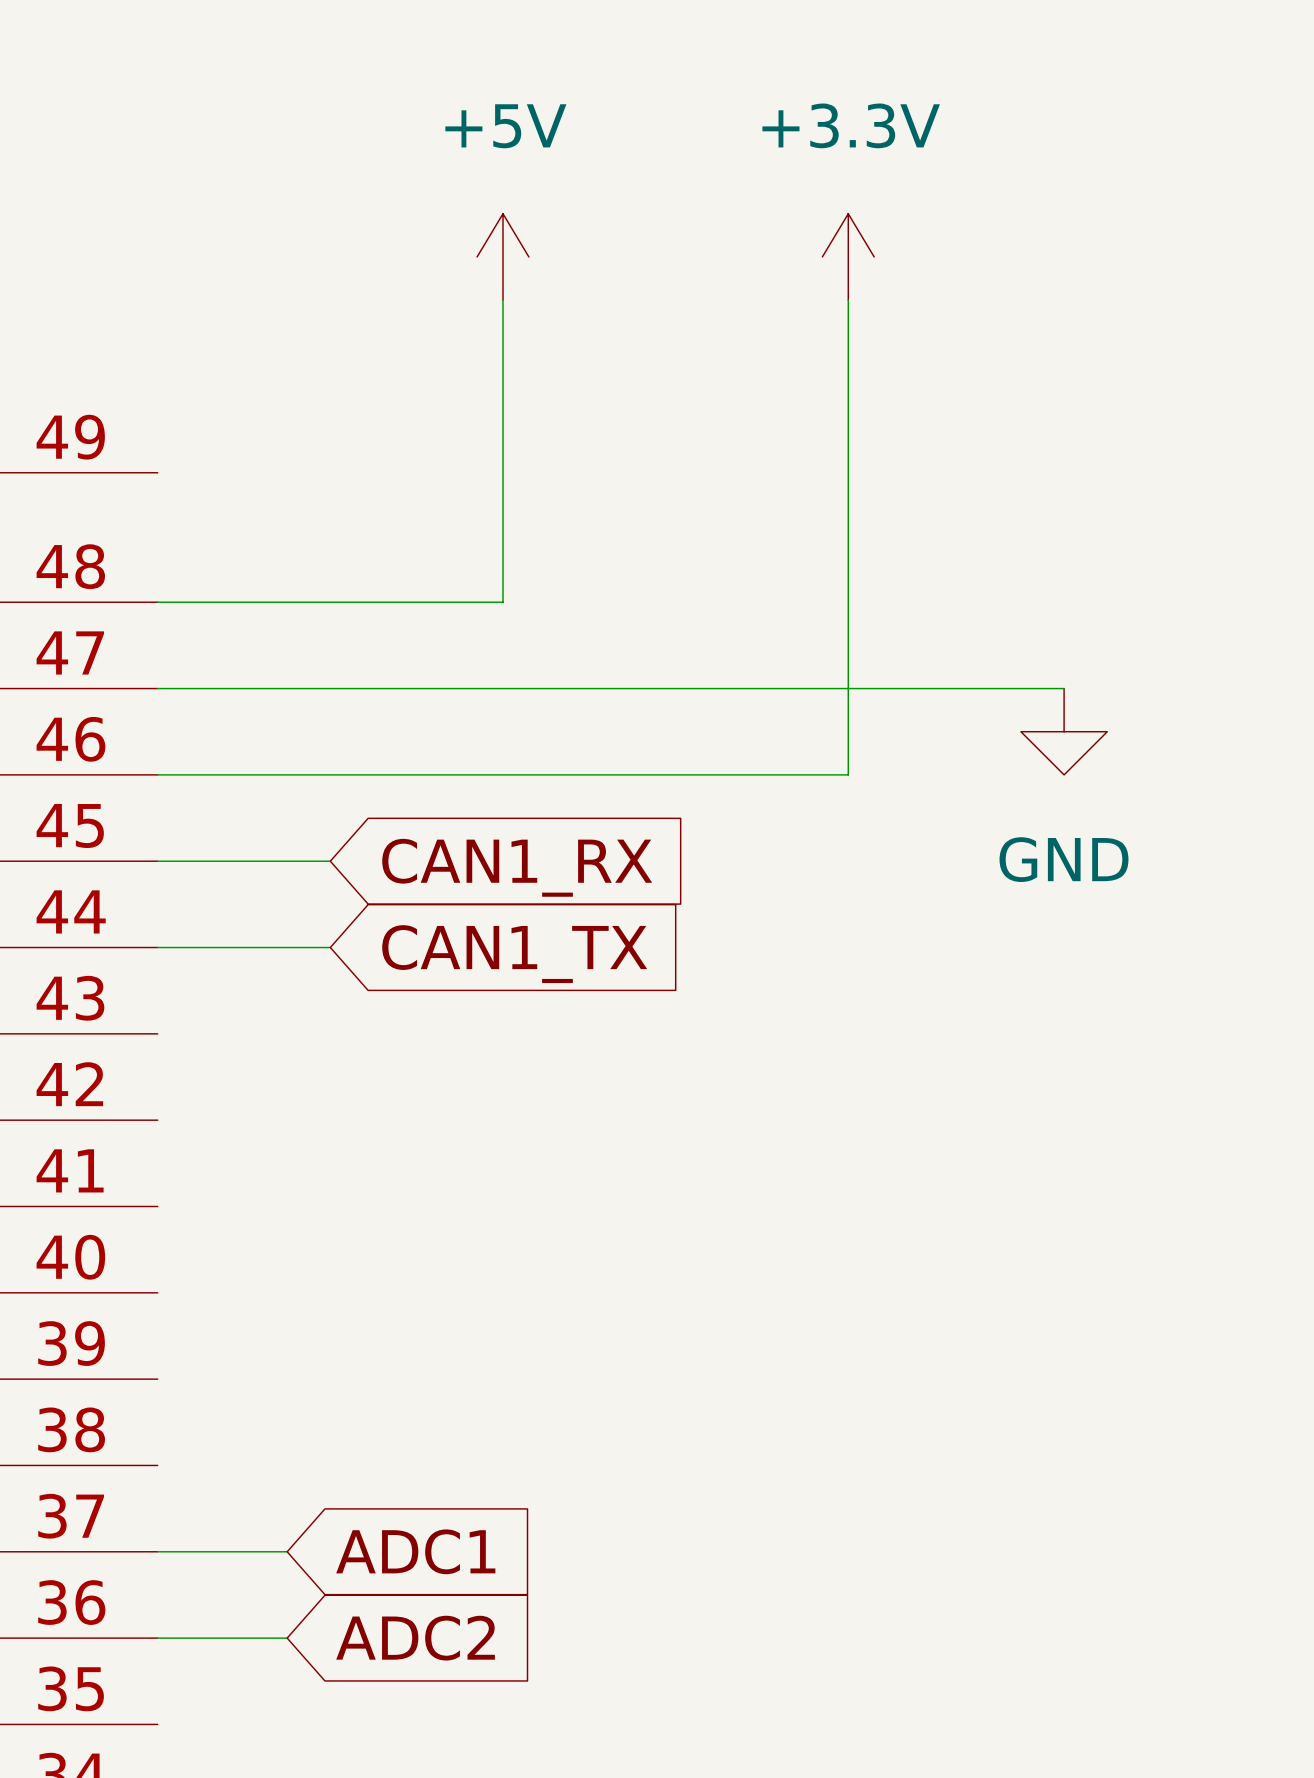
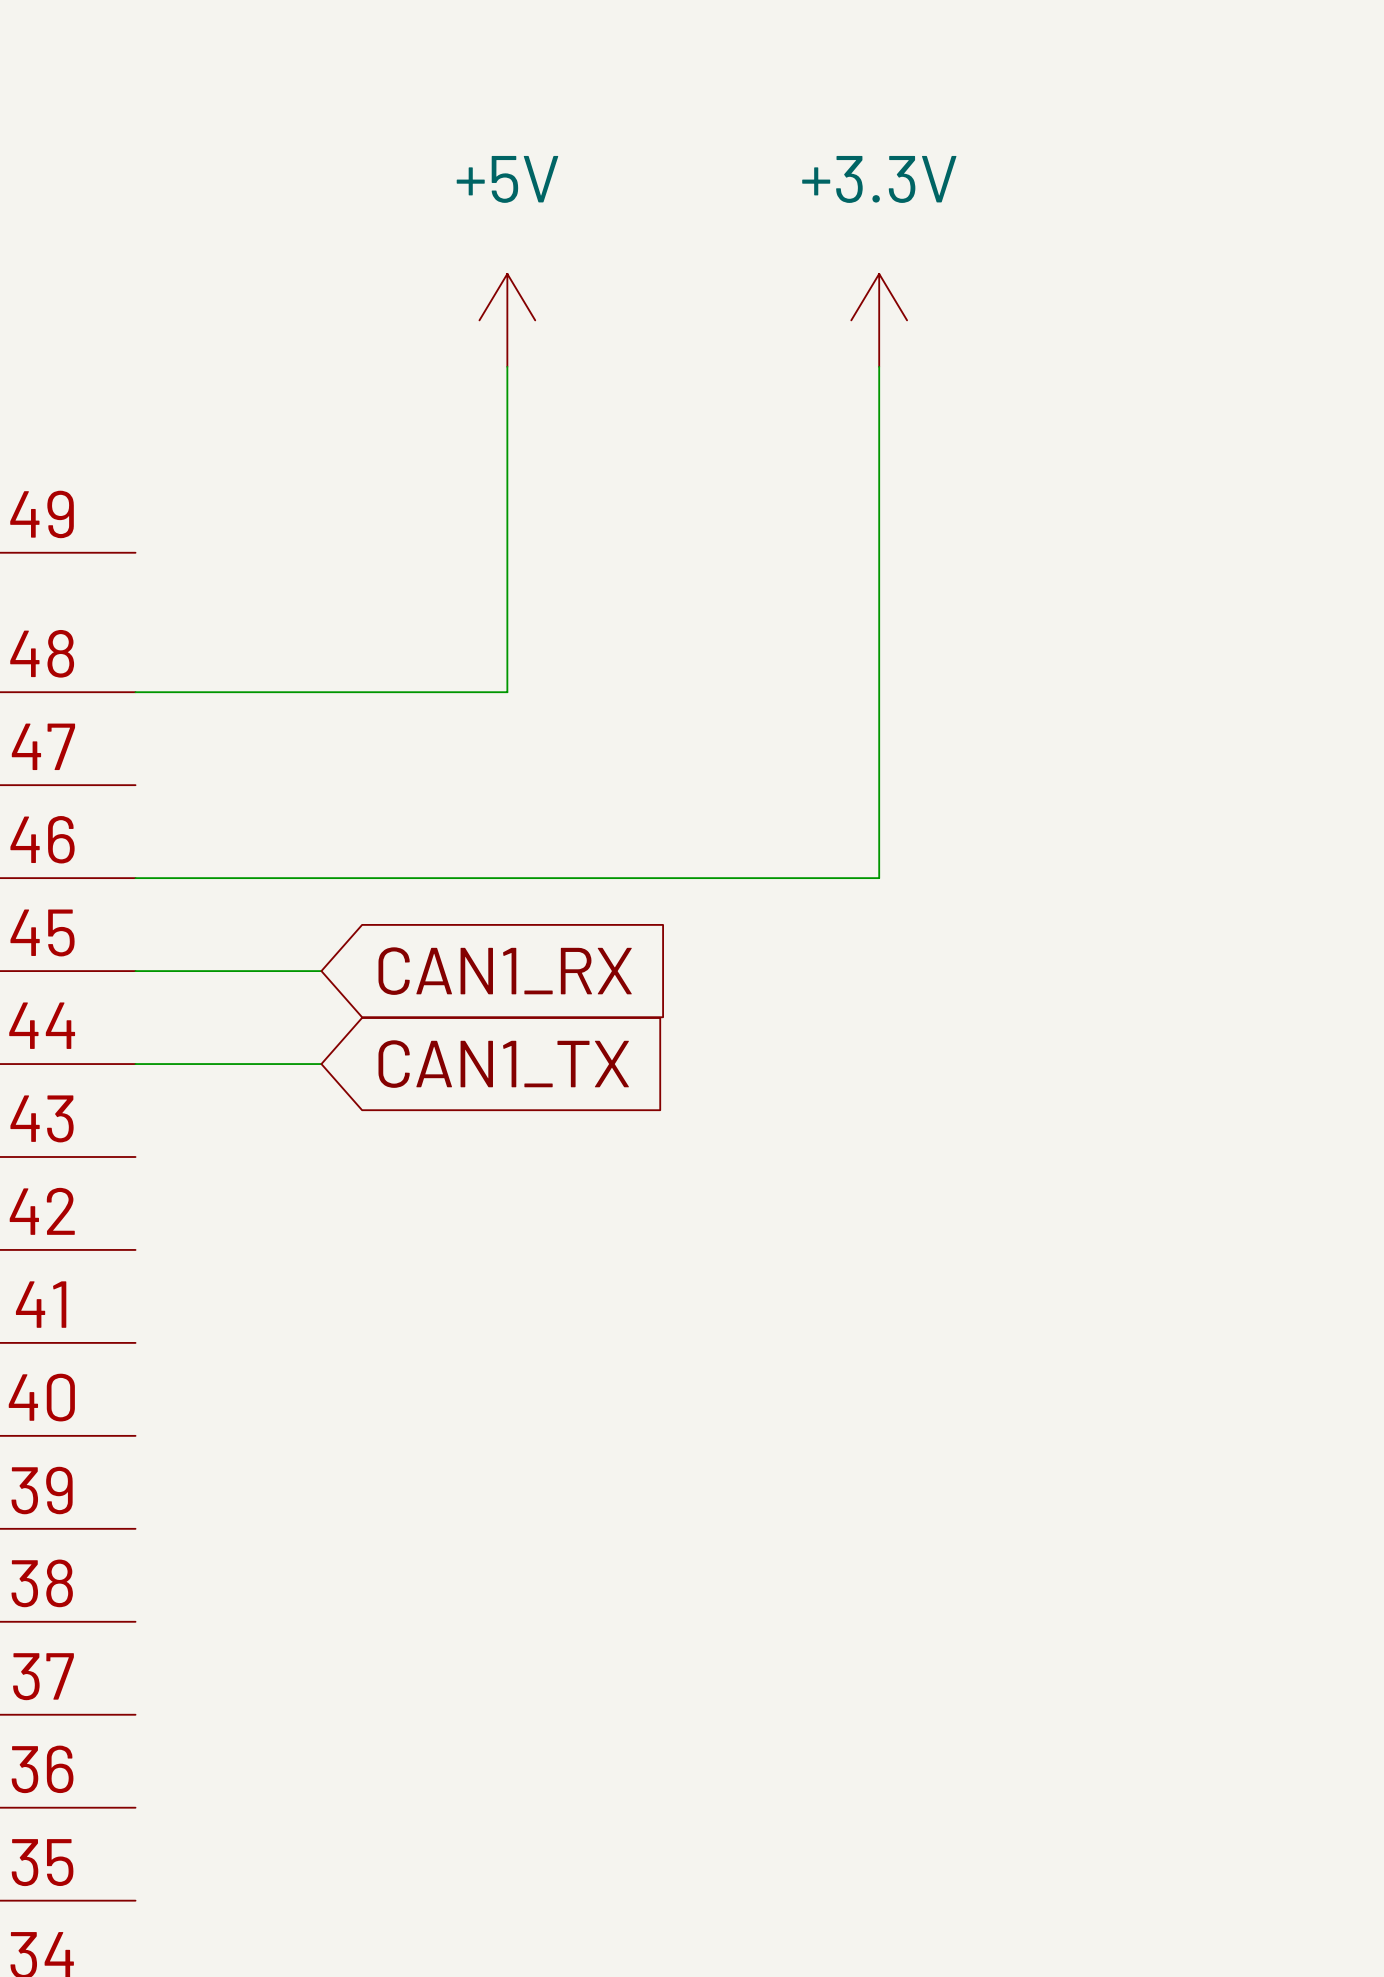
wire: (157, 688) (1064, 688) -> none
power symbol: GND (1064, 731) -> none
wire: (157, 1551) (287, 1551) -> none
global label: ADC1 (415, 1551) -> none
wire: (157, 1638) (287, 1638) -> none
global label: ADC2 (415, 1638) -> none

